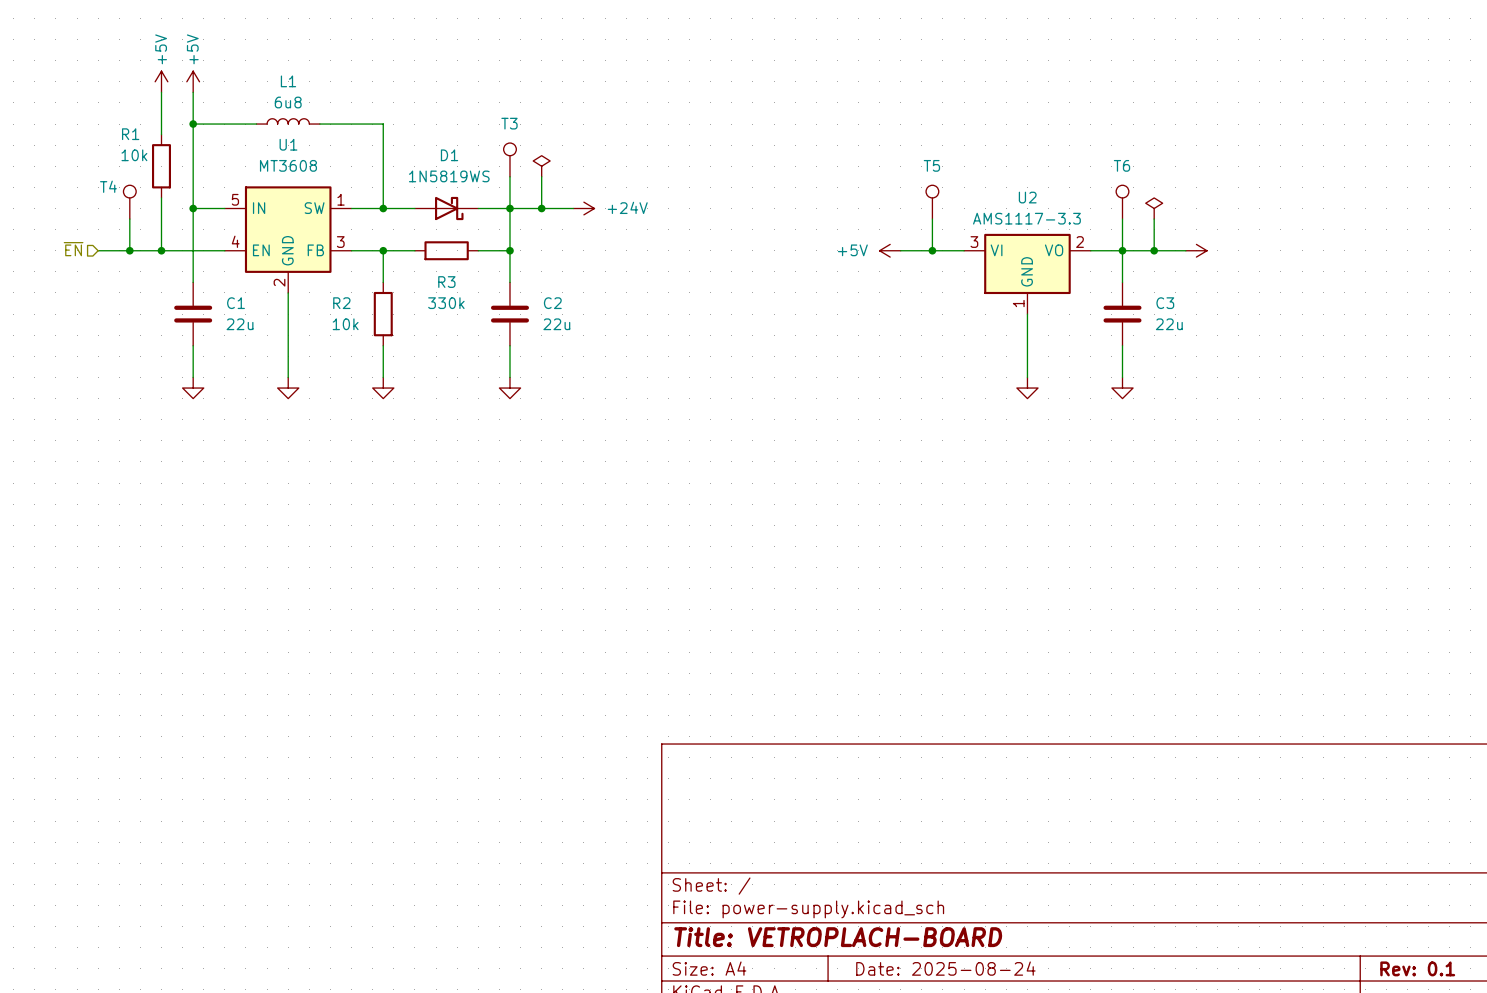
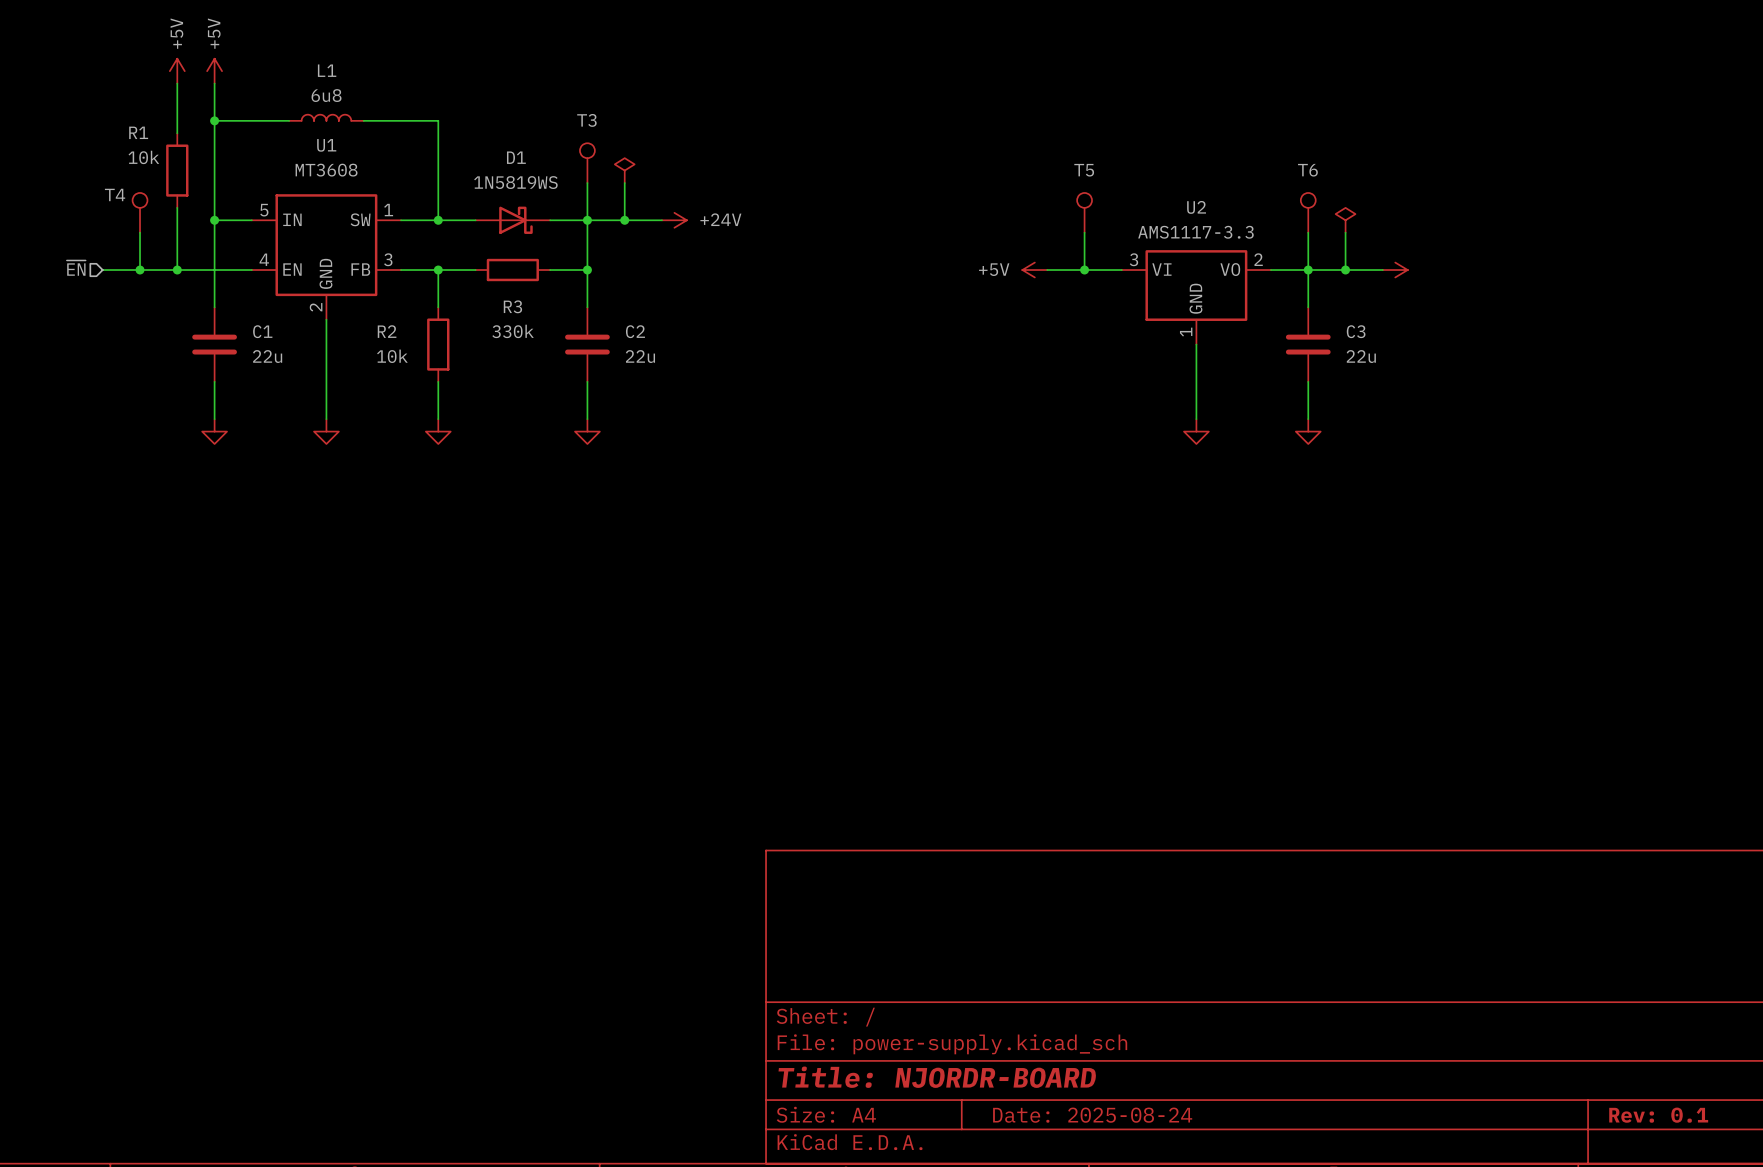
title block: Title: VETROPLACH-BOARD (838, 937) -> Title: NJORDR-BOARD (937, 1077)

